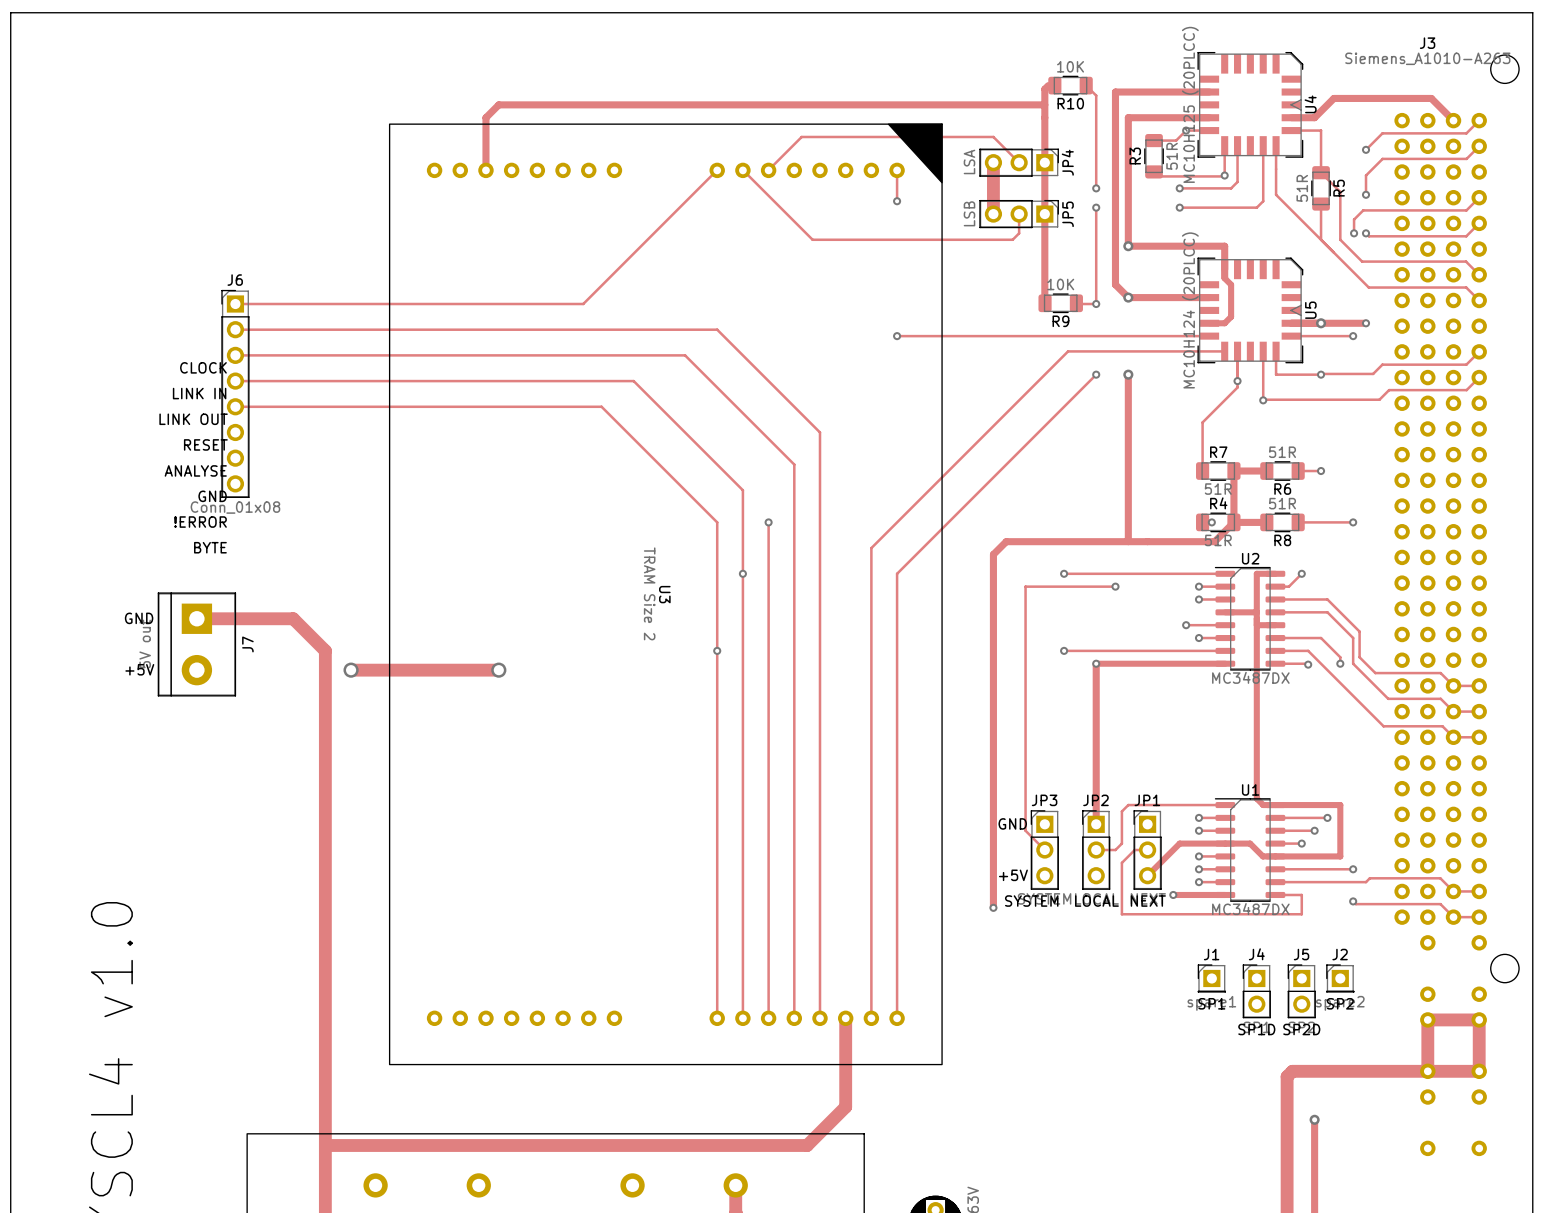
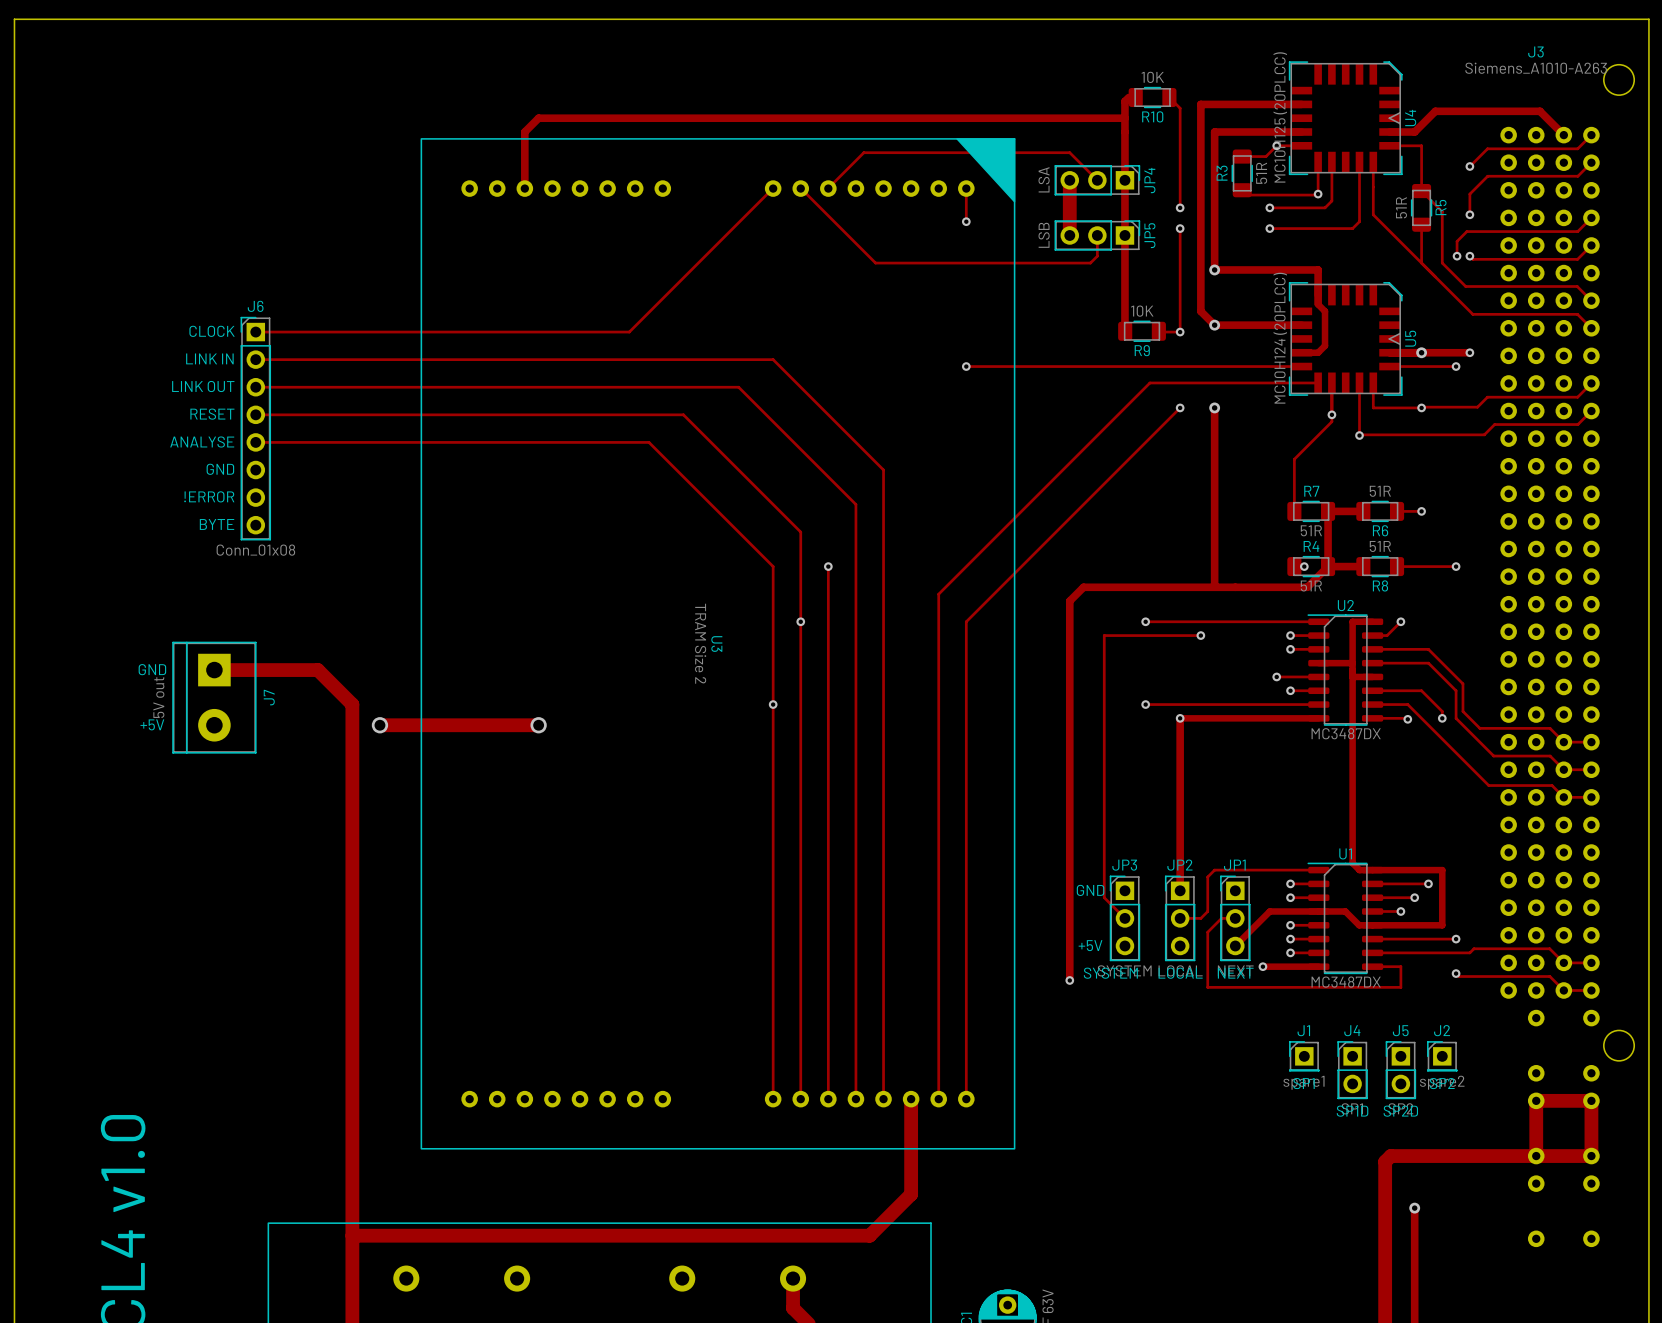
text position: CLOCK (203, 367) -> CLOCK (212, 331)
text position: LINK IN (199, 393) -> LINK IN (209, 358)
text position: LINK OUT (193, 419) -> LINK OUT (203, 386)
text position: RESET (205, 444) -> RESET (212, 414)
text position: ANALYSE (195, 470) -> ANALYSE (202, 442)
text position: GND (212, 496) -> GND (220, 469)
text position: !ERROR (200, 522) -> !ERROR (209, 496)
text position: BYTE (210, 547) -> BYTE (217, 524)

